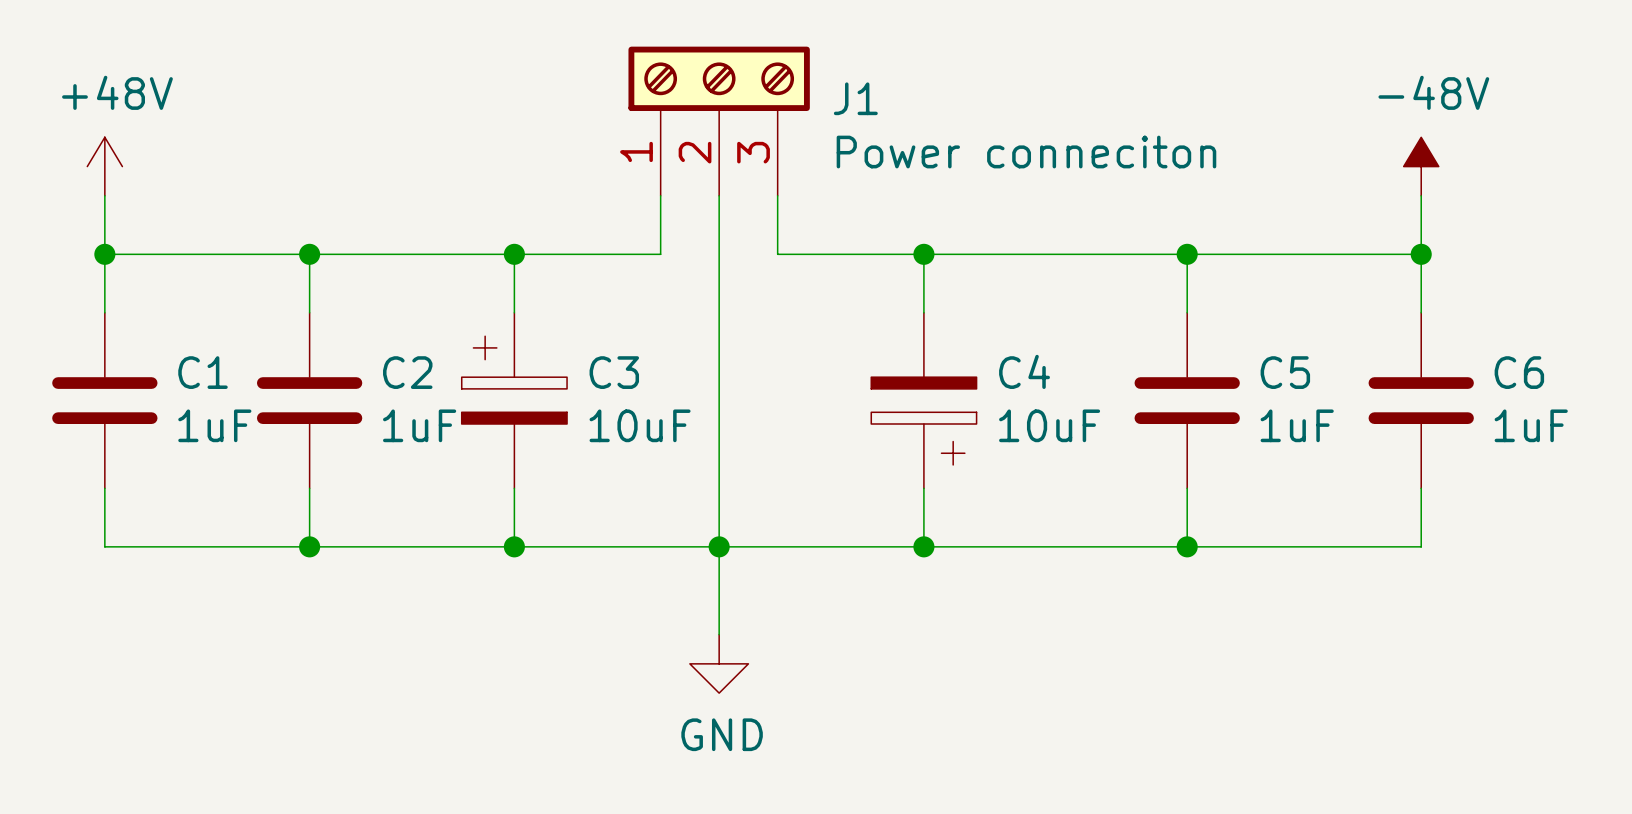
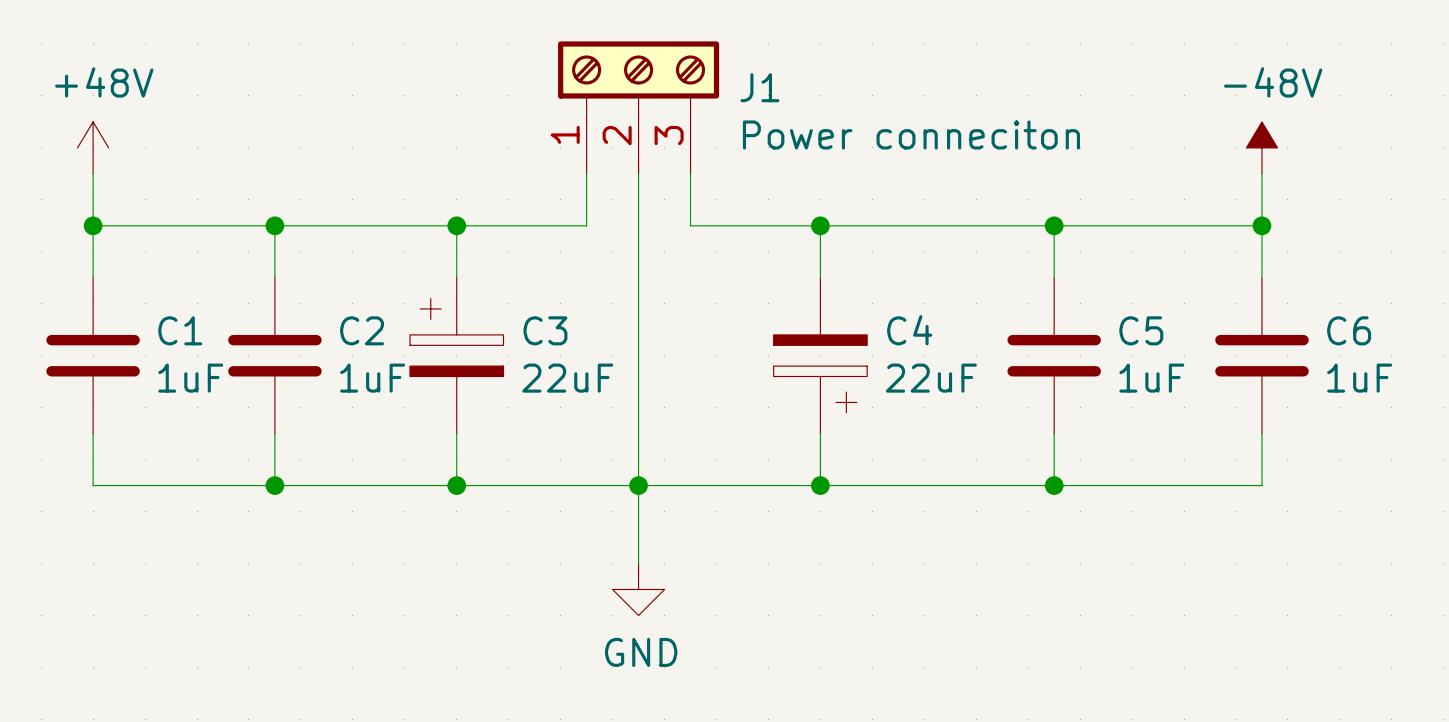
C3 value: 10uF (640, 425) -> 22uF (567, 378)
C4 value: 10uF (1049, 425) -> 22uF (931, 378)

